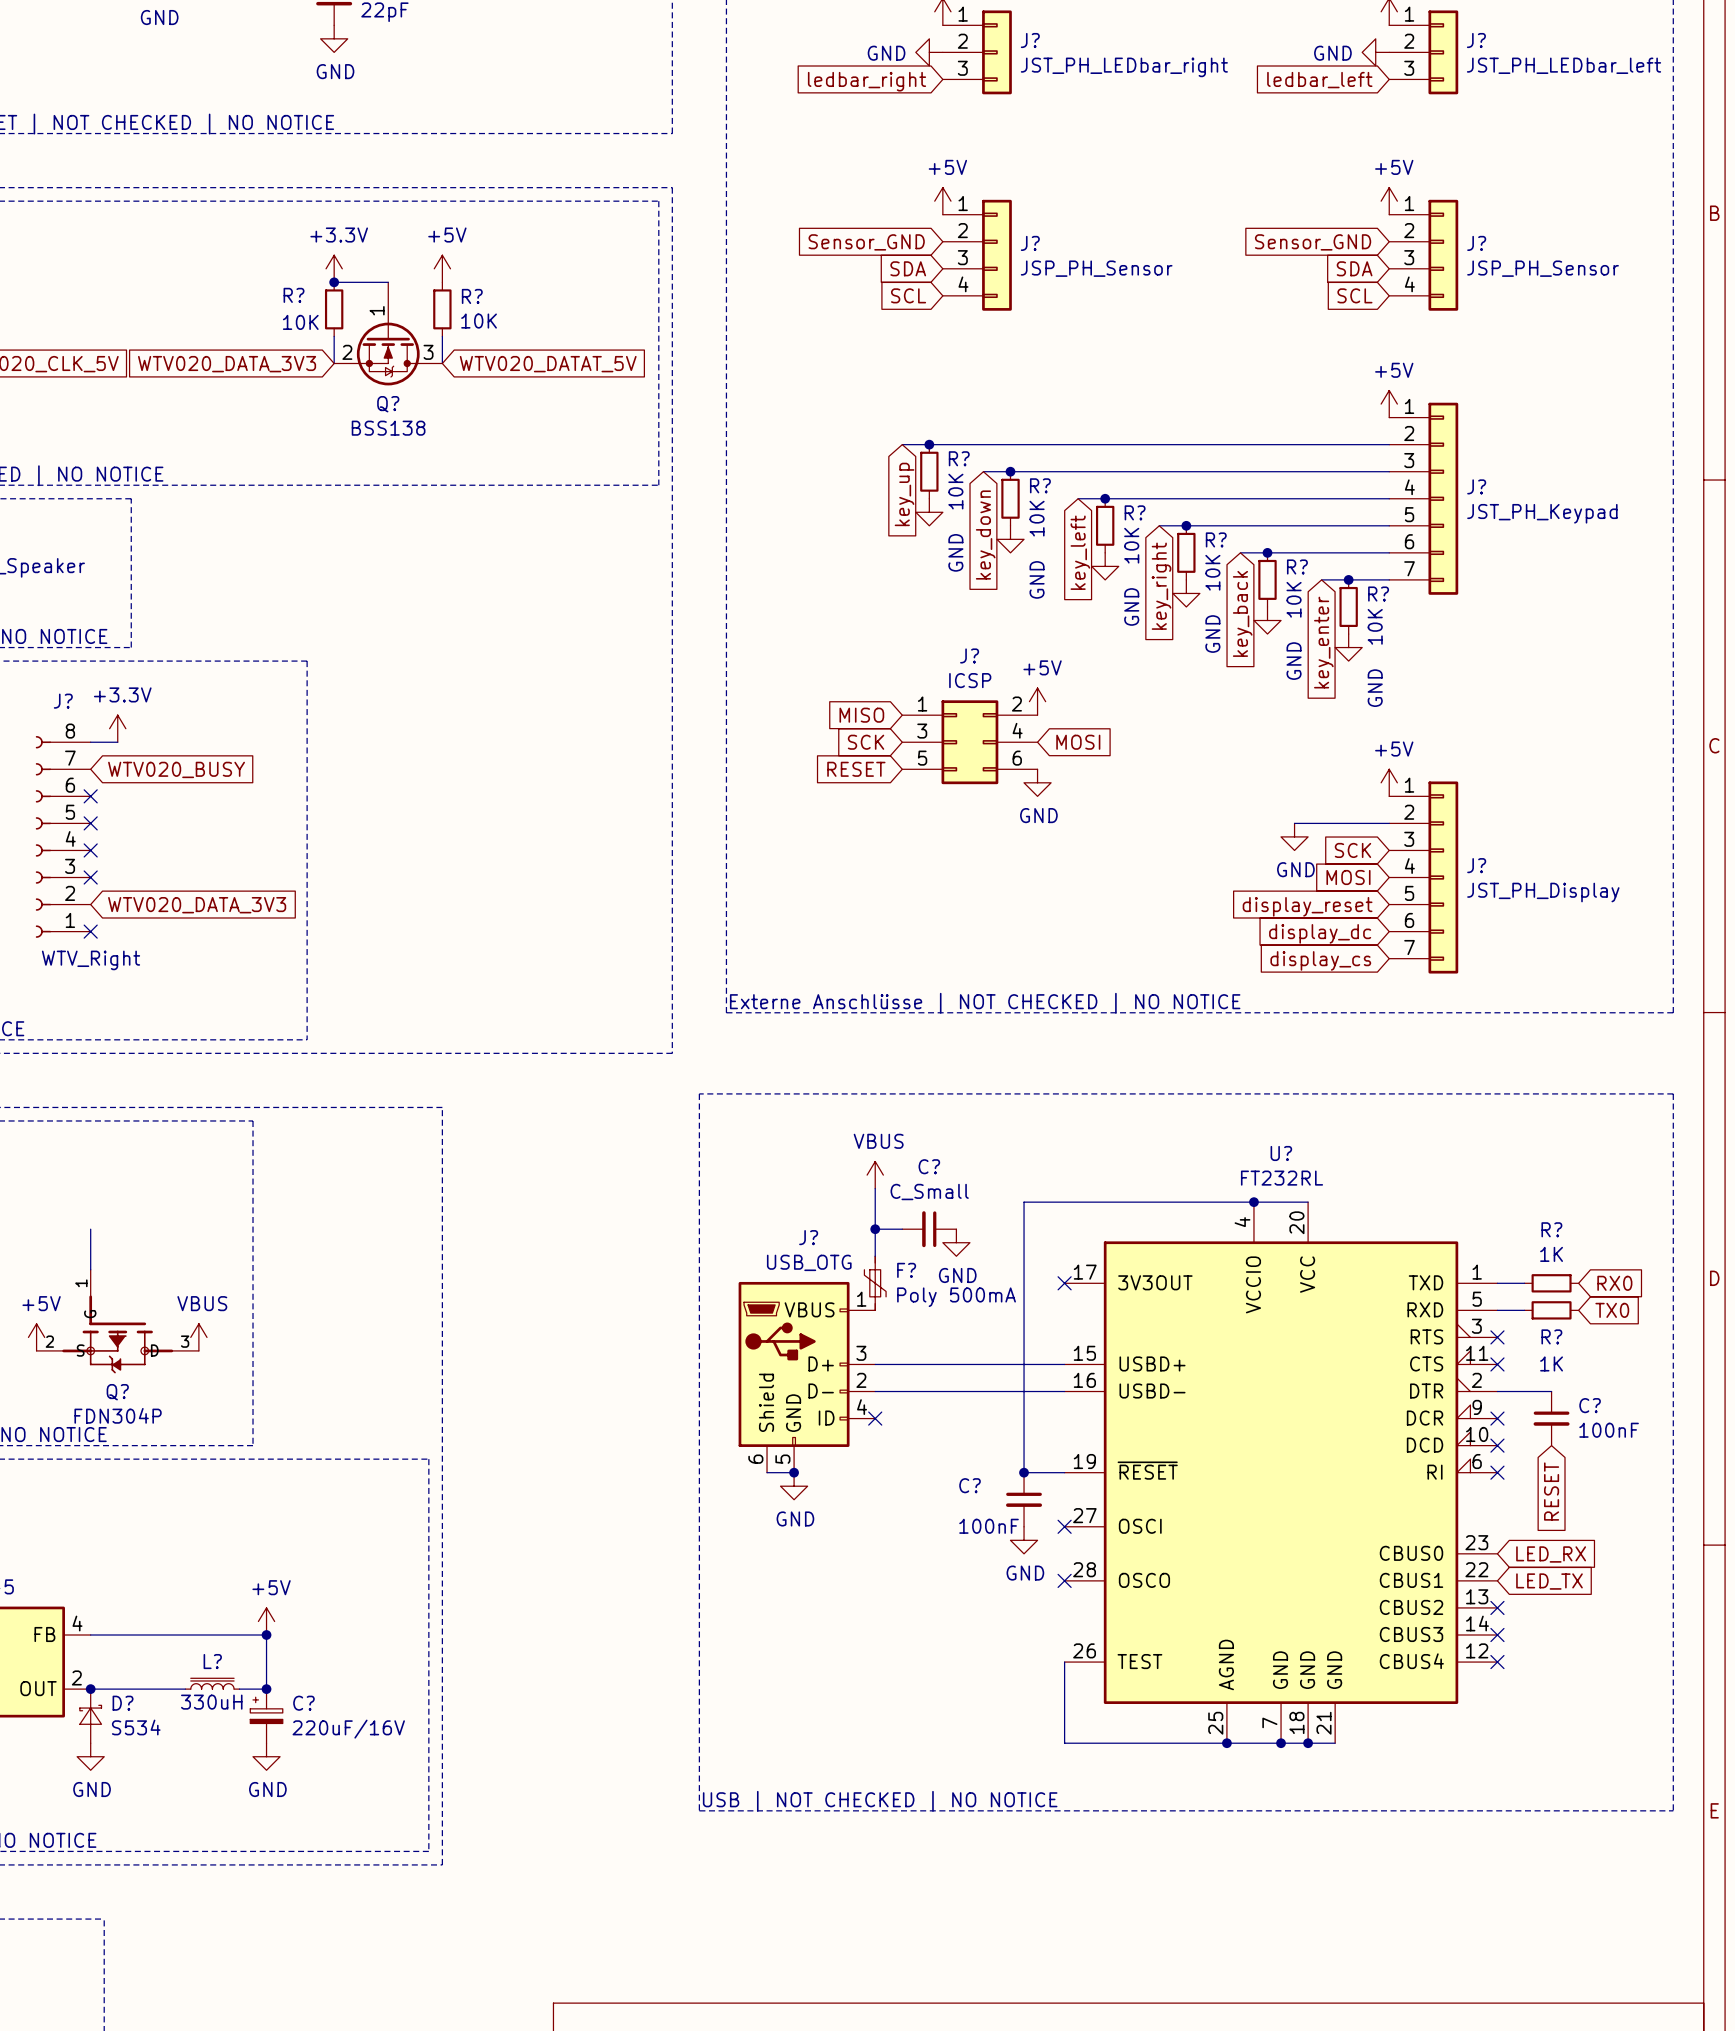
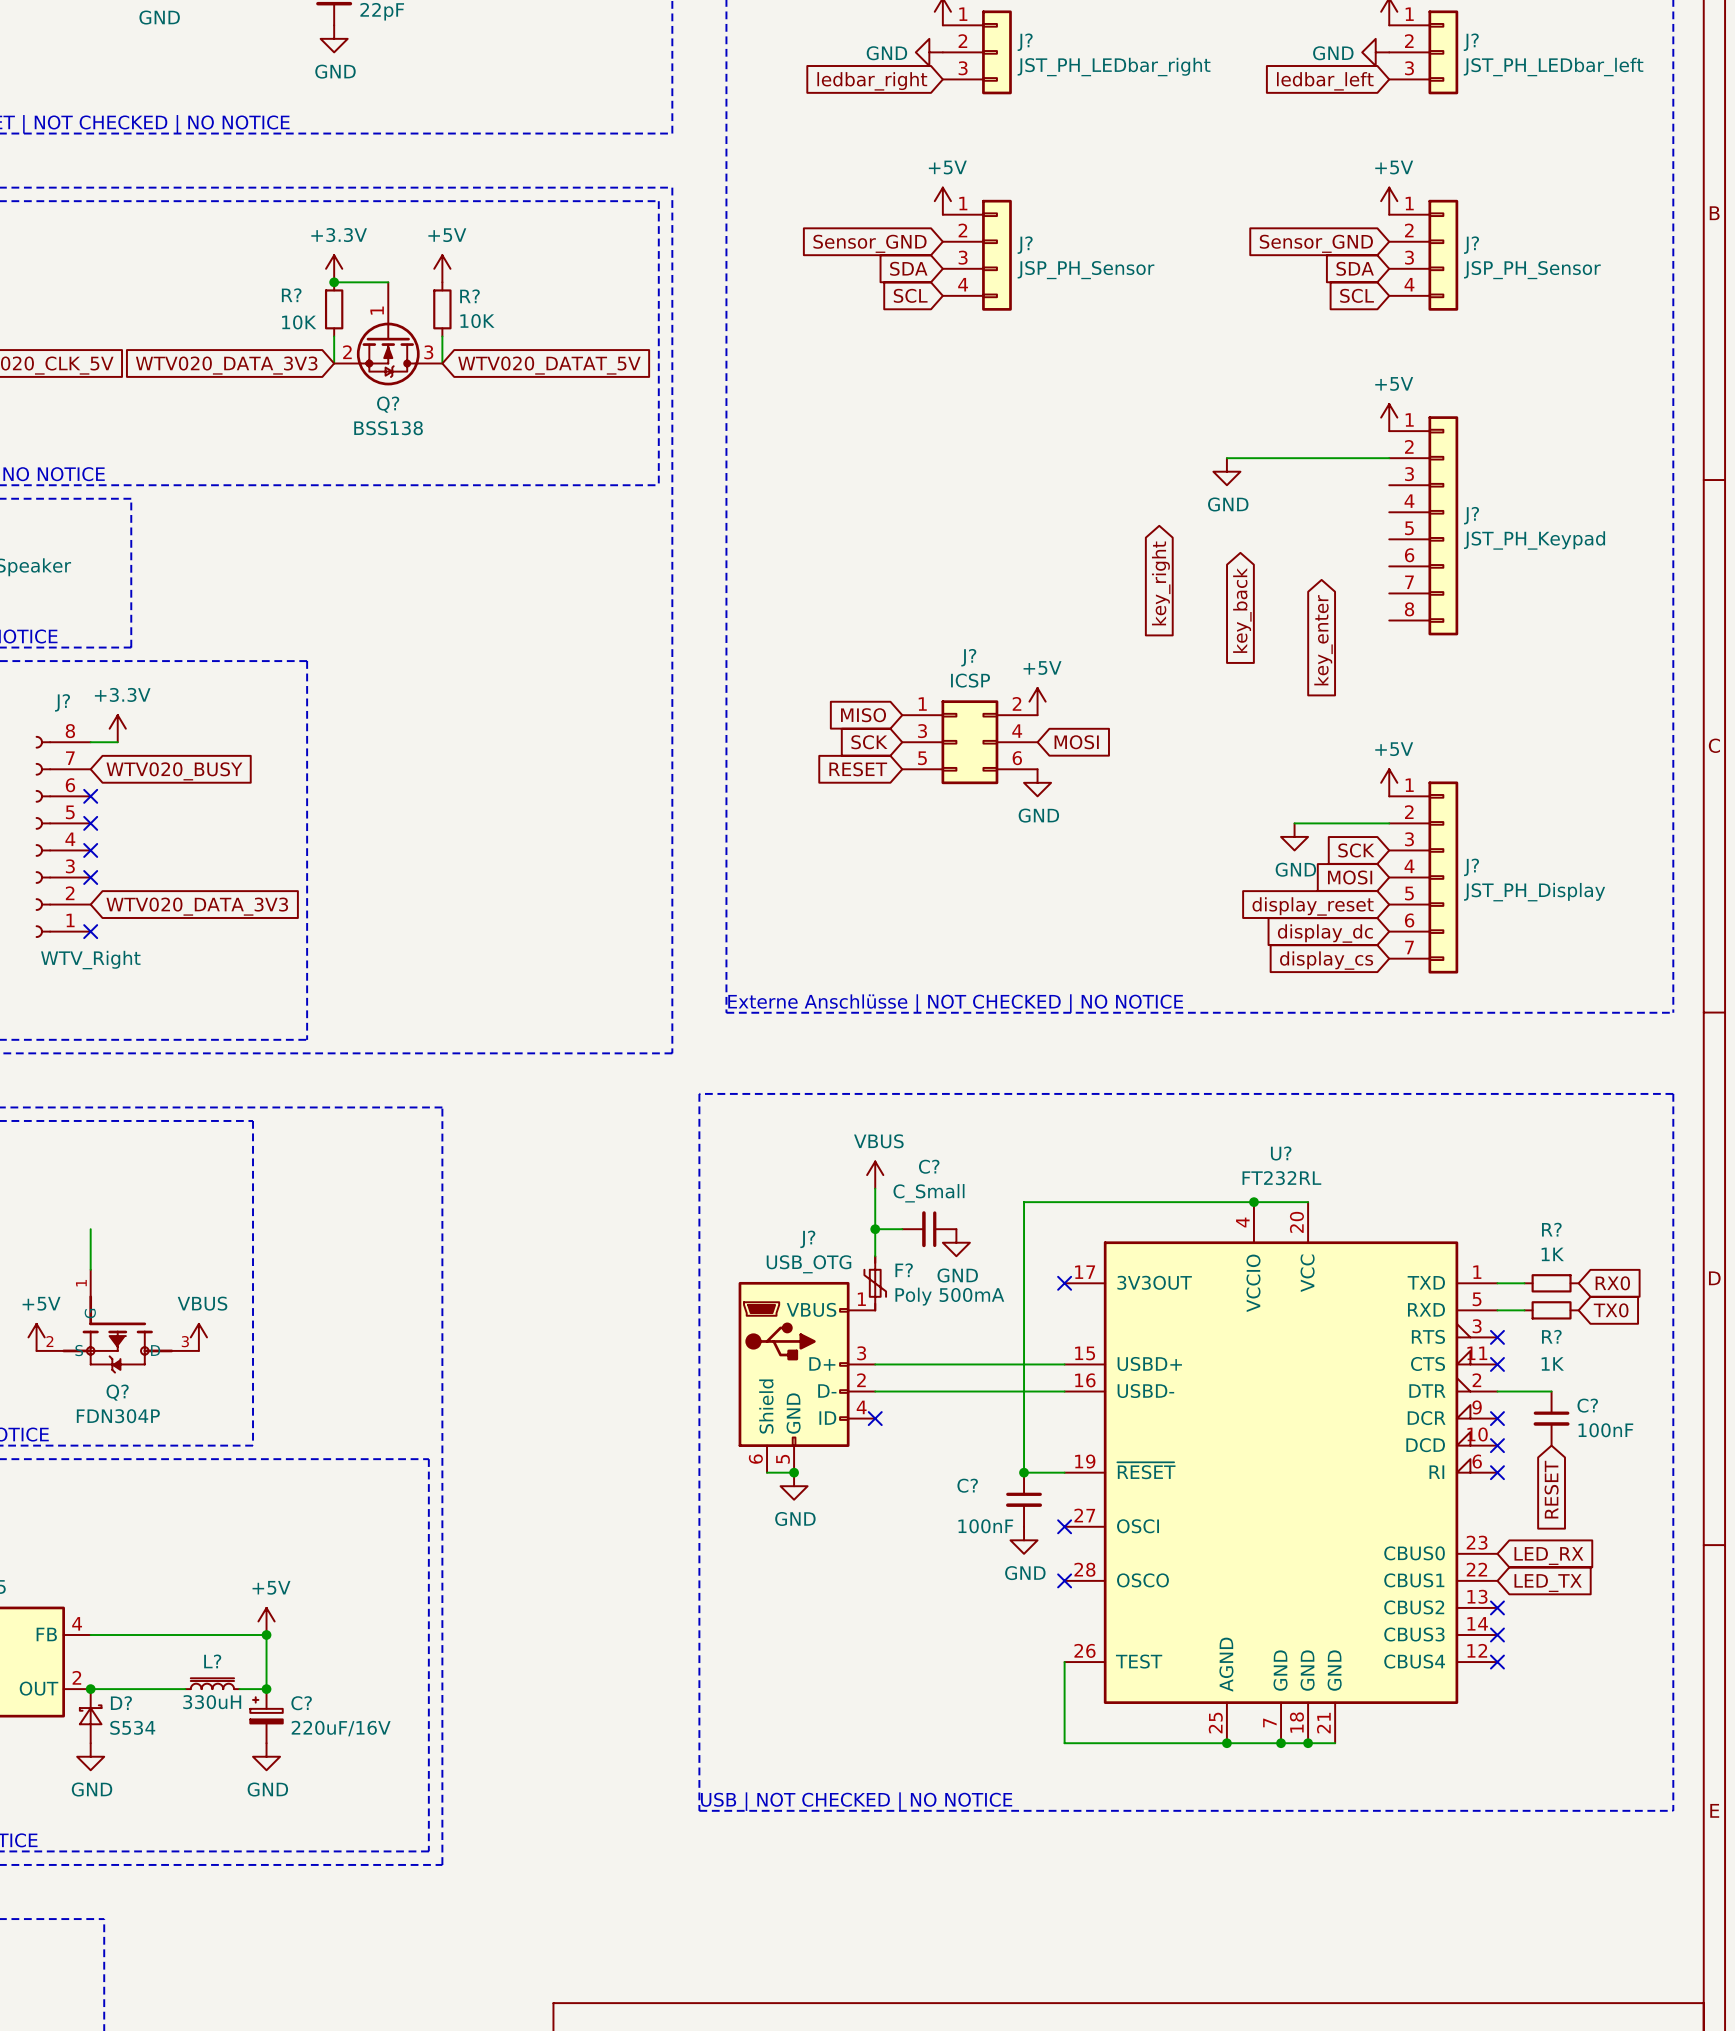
power symbol position: +5V (1389, 404) -> +5V (1389, 417)
wire: (902, 444) (1389, 444) -> none
junction: (929, 444) -> none
wire: none -> (1226, 458) (1389, 458)
R?: 10K (929, 471) -> none
wire: (983, 471) (1389, 471) -> none
junction: (1010, 471) -> none
power symbol: none -> GND (1226, 471)
global label: key_up (904, 494) -> none
R?: 10K (1010, 498) -> none
wire: (1078, 498) (1389, 498) -> none
junction: (1105, 498) -> none
J?: JST_PH_Keypad (1423, 498) -> none
power symbol: GND (929, 512) -> none
R?: 10K (1105, 525) -> none
wire: (1159, 525) (1389, 525) -> none
junction: (1186, 525) -> none
J?: none -> JST_PH_Keypad (1423, 525)
global label: key_down (985, 535) -> none
power symbol: GND (1010, 539) -> none
global label: key_left (1080, 552) -> none
R?: 10K (1186, 552) -> none
wire: (1240, 552) (1389, 552) -> none
junction: (1267, 552) -> none
power symbol: GND (1105, 566) -> none
R?: 10K (1267, 579) -> none
wire: (1321, 579) (1389, 579) -> none
junction: (1348, 579) -> none
power symbol: GND (1186, 593) -> none
R?: 10K (1348, 606) -> none
power symbol: GND (1267, 620) -> none
power symbol: GND (1348, 647) -> none

